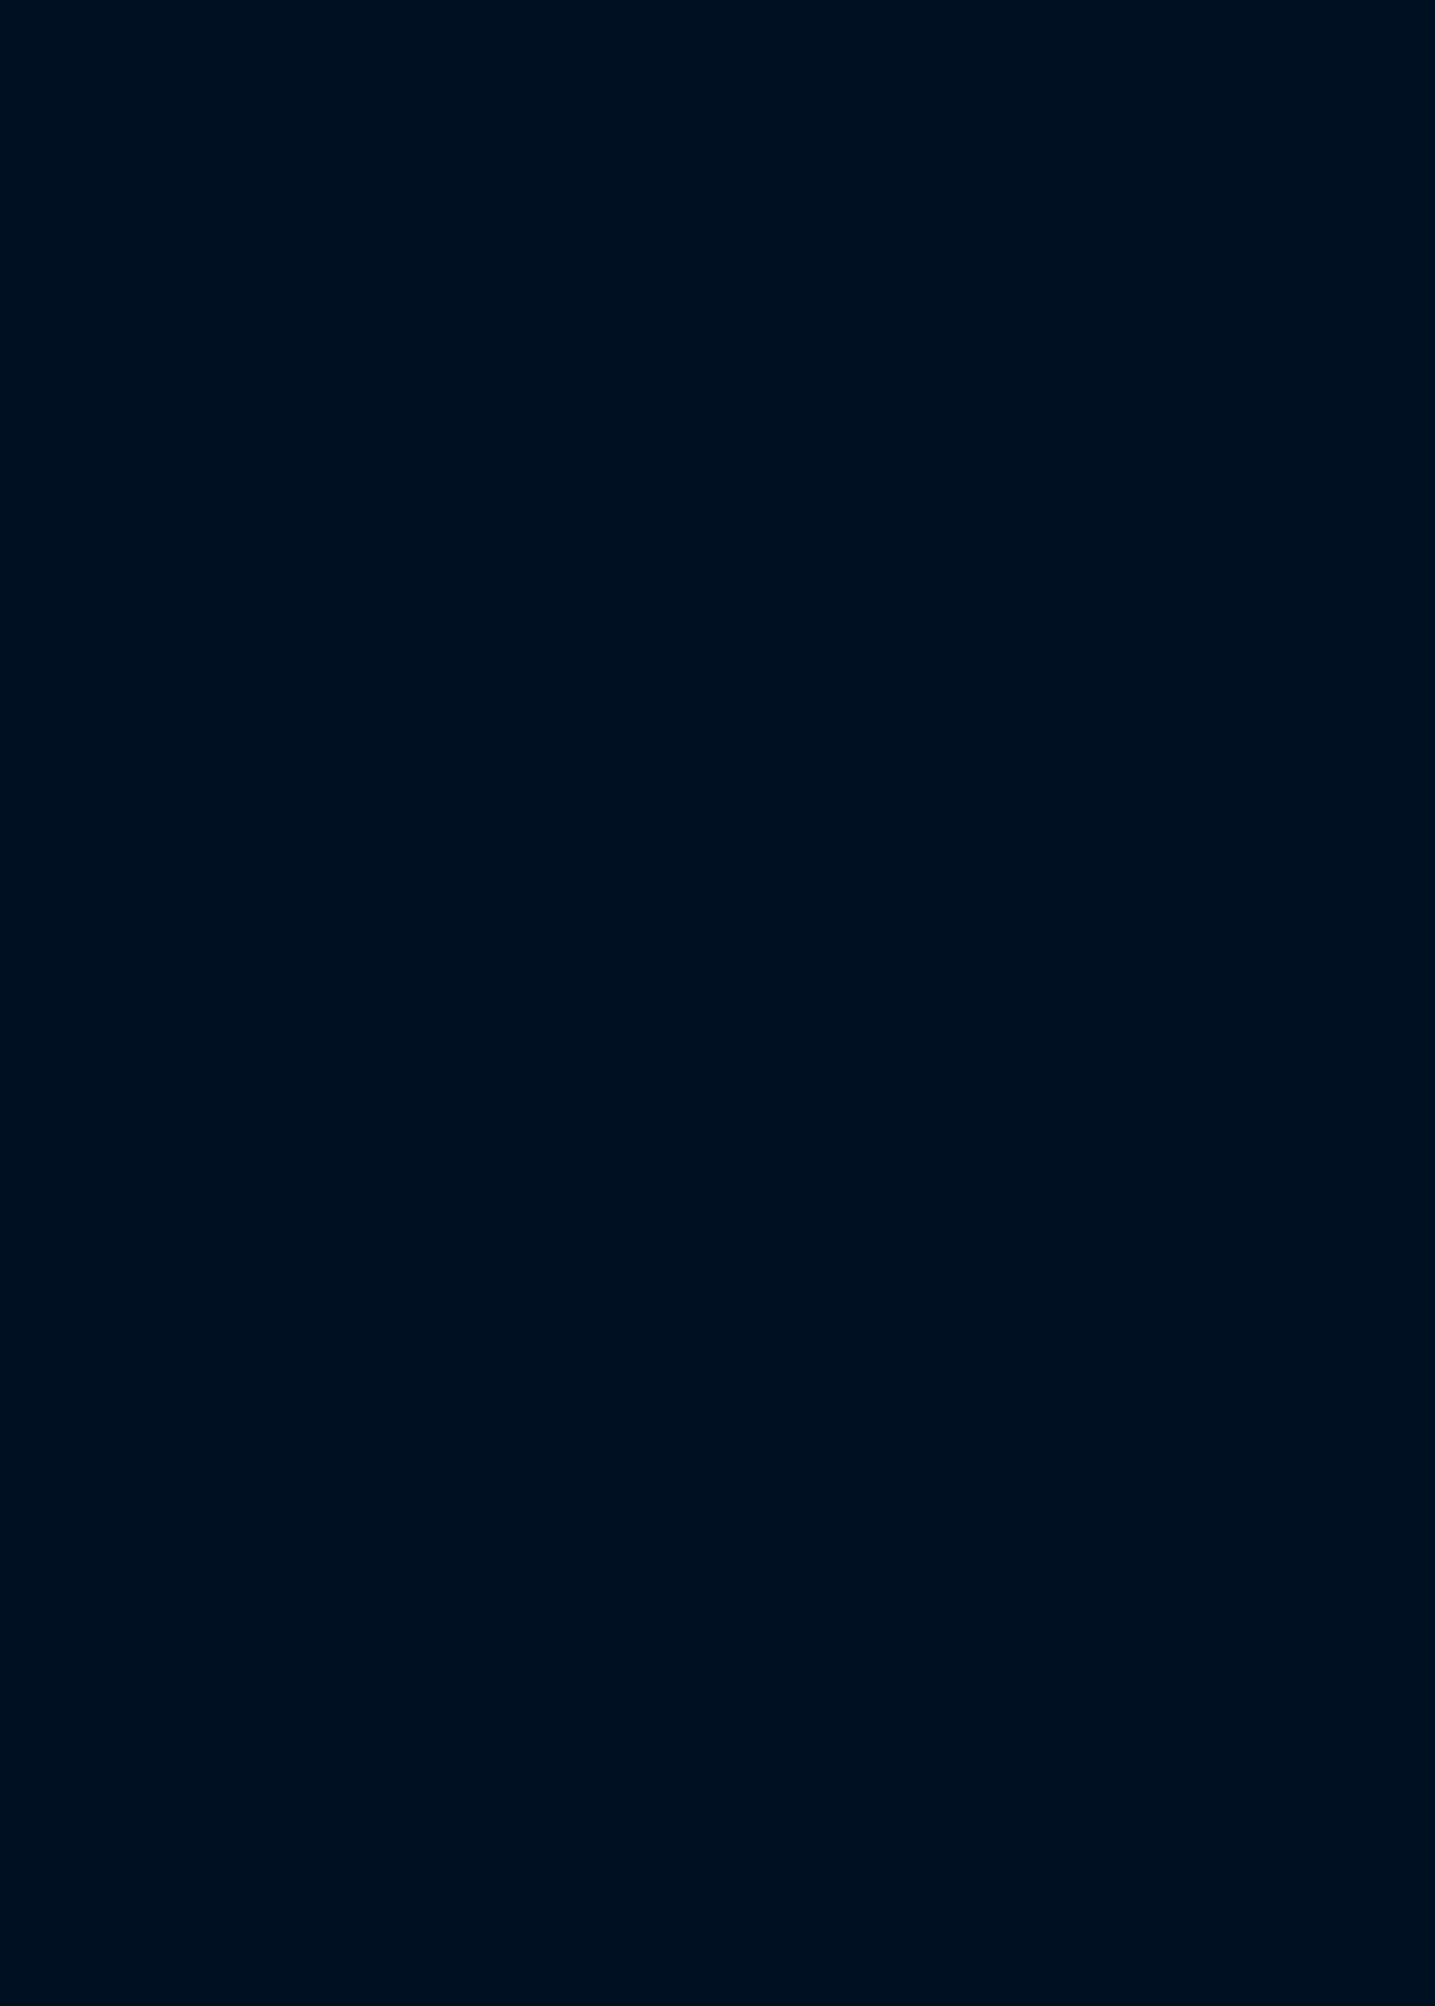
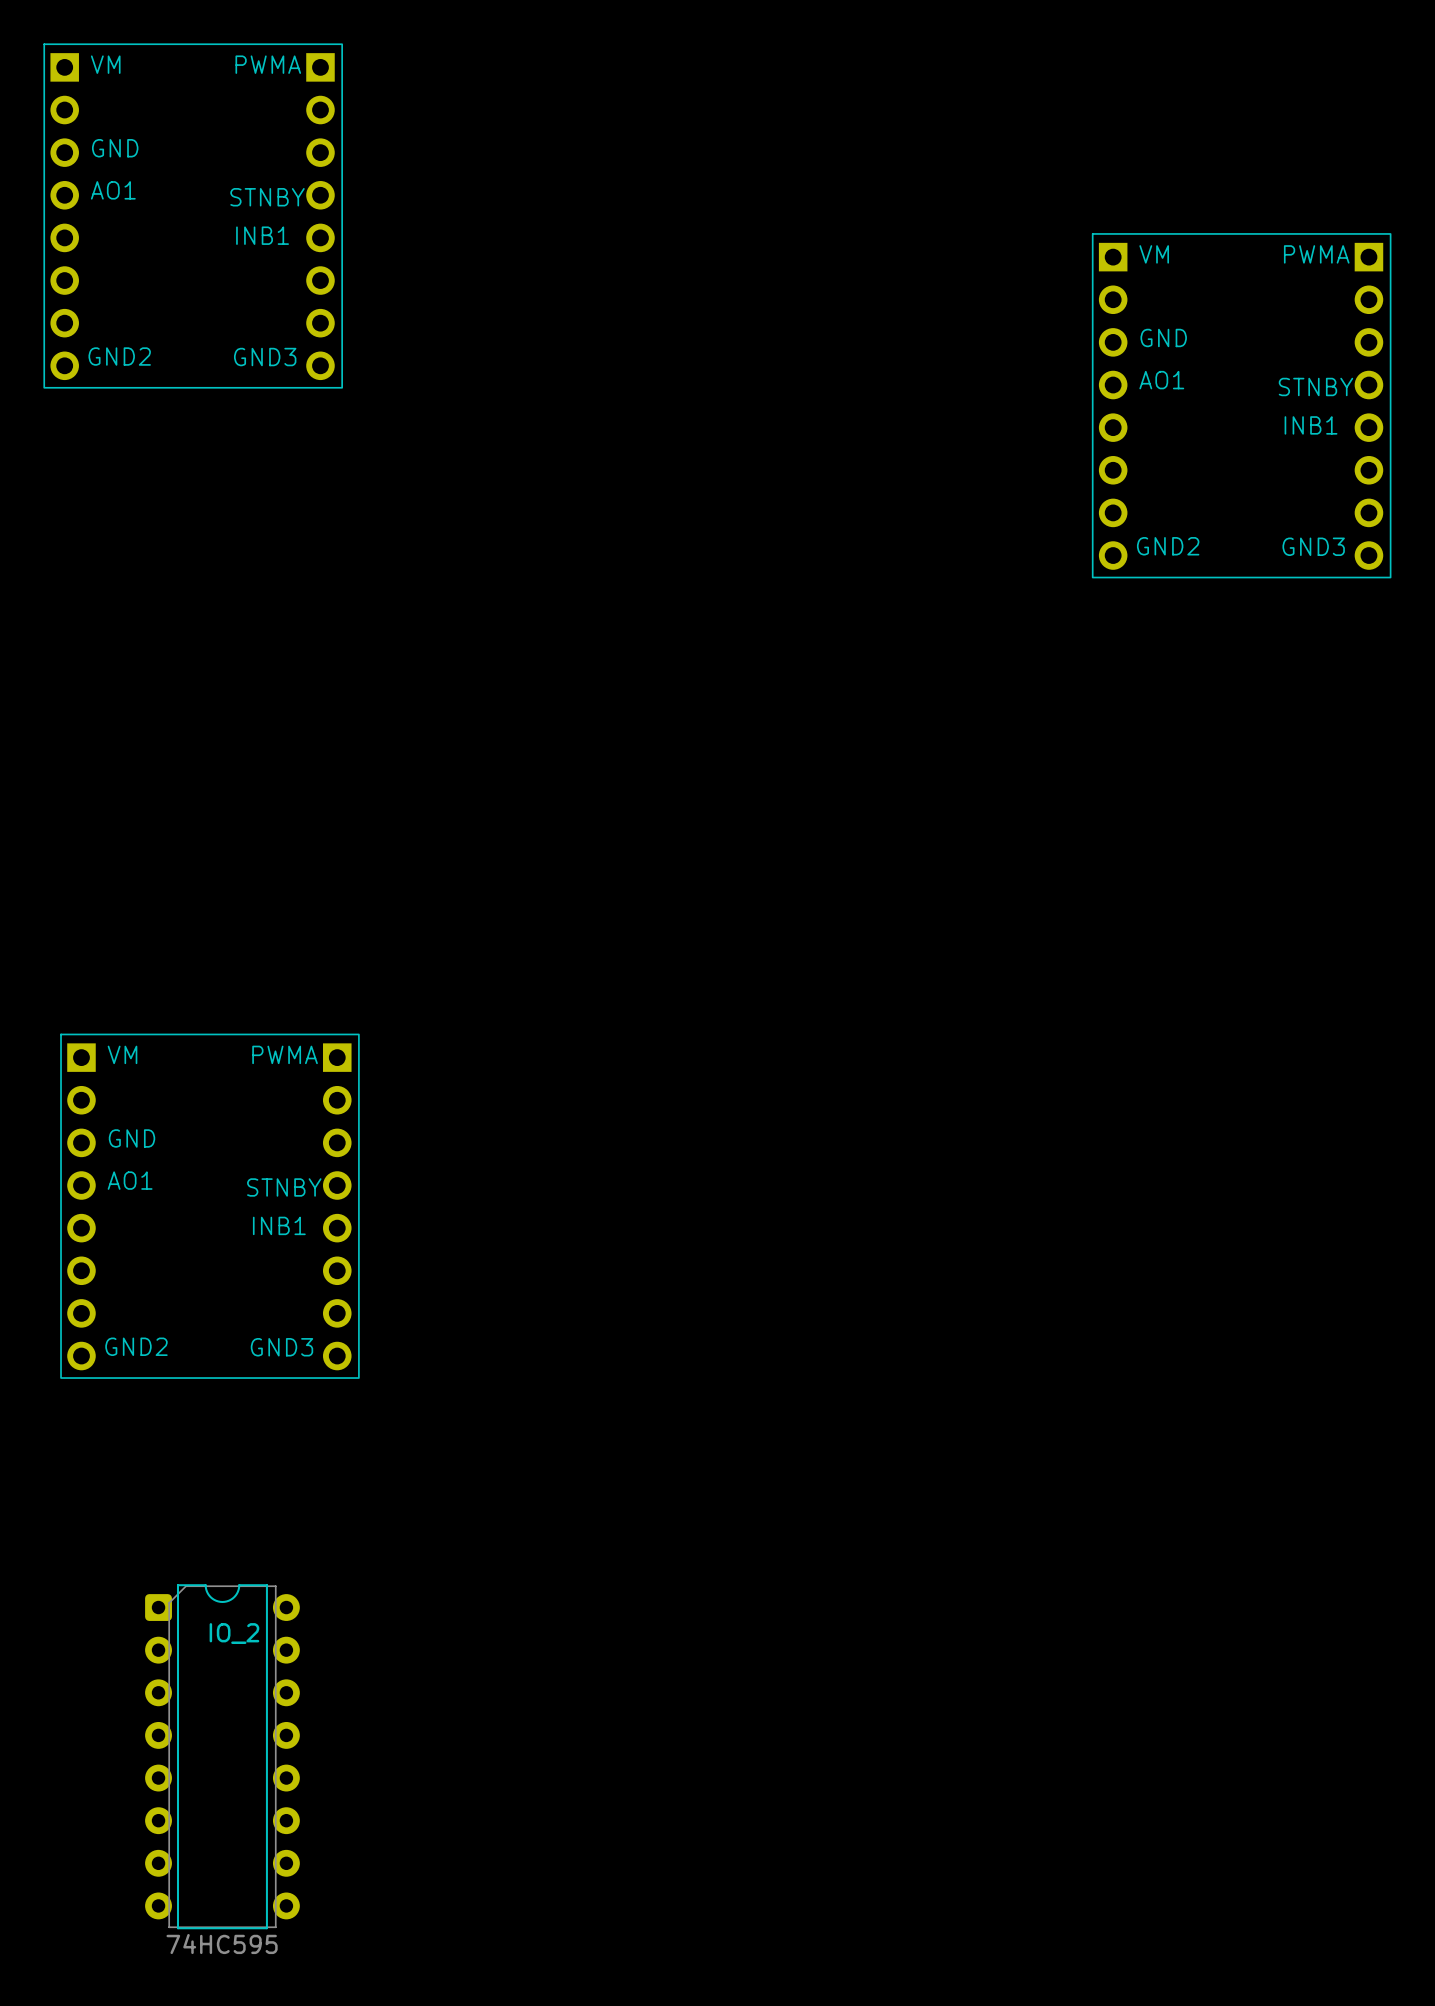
part: none -> (193, 216)
part: none -> (1241, 405)
part: none -> (209, 1206)
IO_2: none -> 74HC595 (222, 1756)

